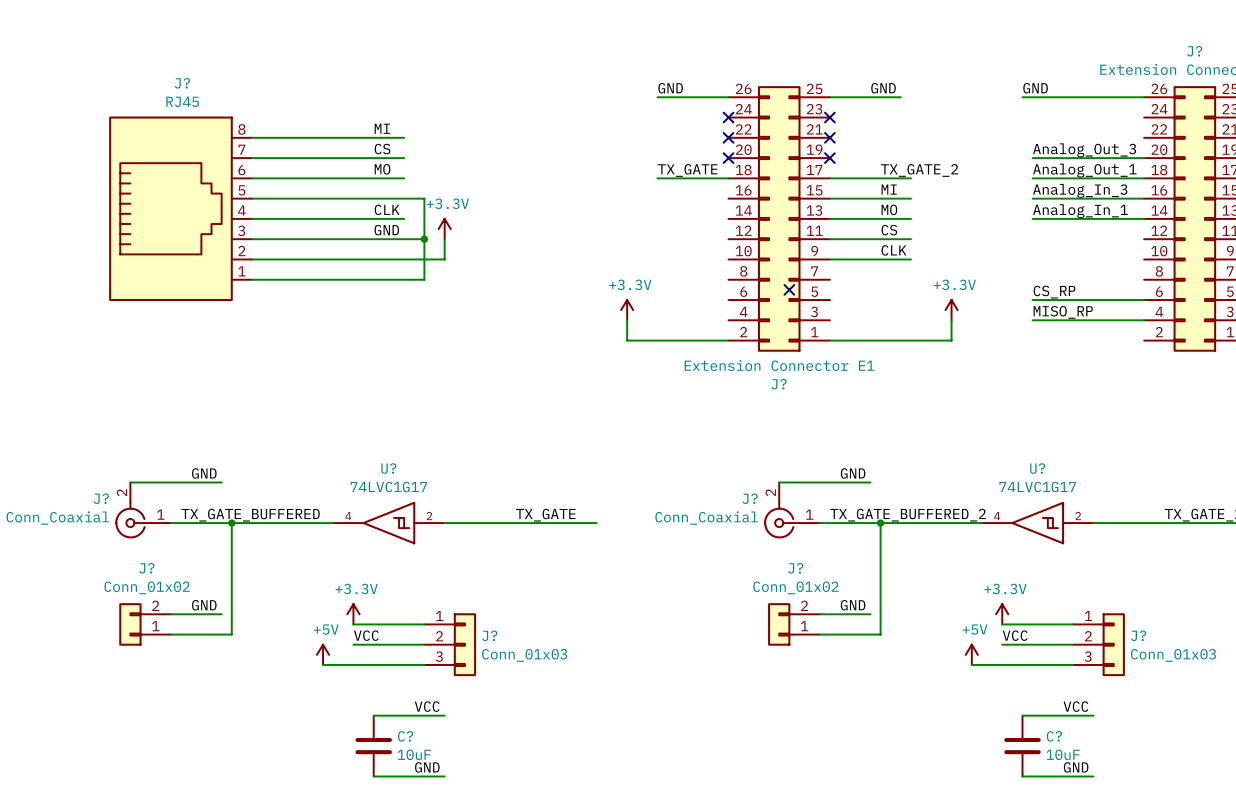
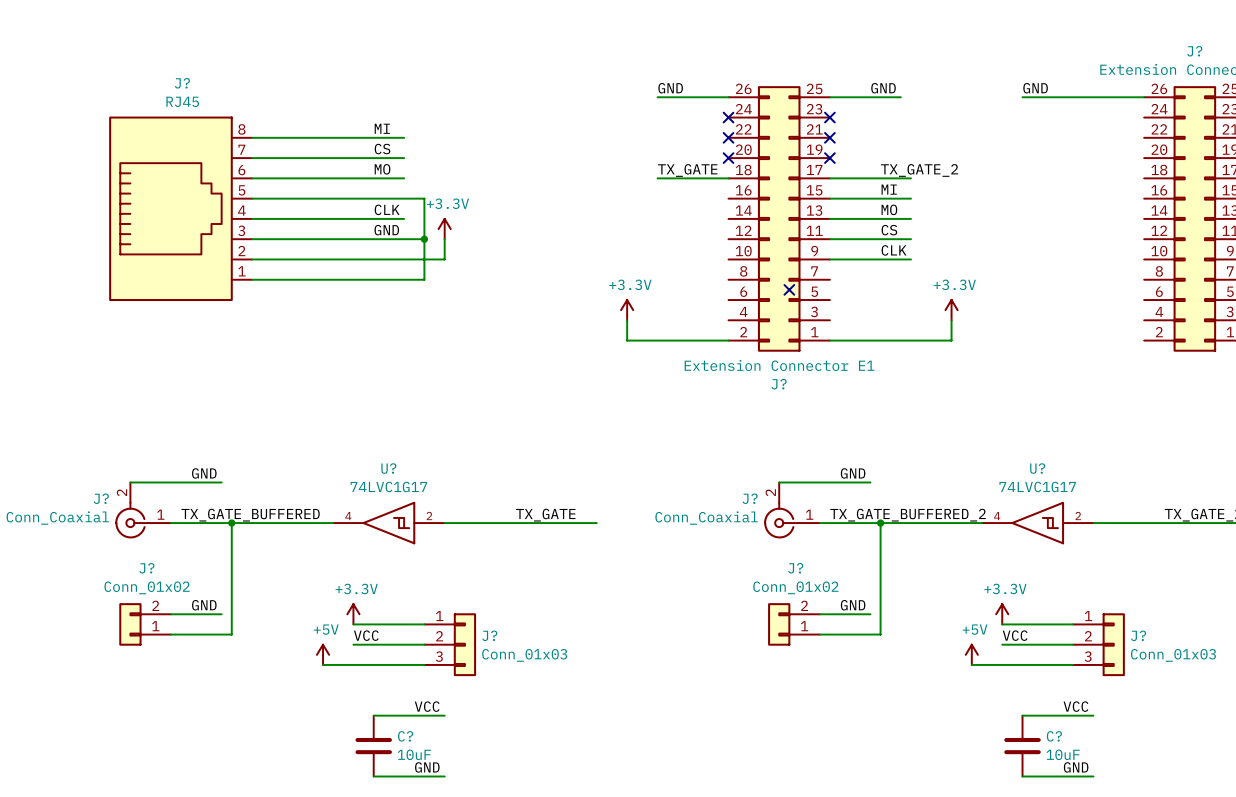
label: Analog_Out_3 (1084, 150) -> none
wire: (1032, 158) (1144, 158) -> none
label: Analog_Out_1 (1084, 170) -> none
wire: (1032, 178) (1144, 178) -> none
label: Analog_In_3 (1080, 190) -> none
wire: (1032, 198) (1144, 198) -> none
label: Analog_In_1 (1080, 211) -> none
wire: (1032, 218) (1144, 218) -> none
label: CS_RP (1054, 292) -> none
wire: (1032, 300) (1144, 300) -> none
label: MISO_RP (1063, 312) -> none
wire: (1032, 320) (1144, 320) -> none

